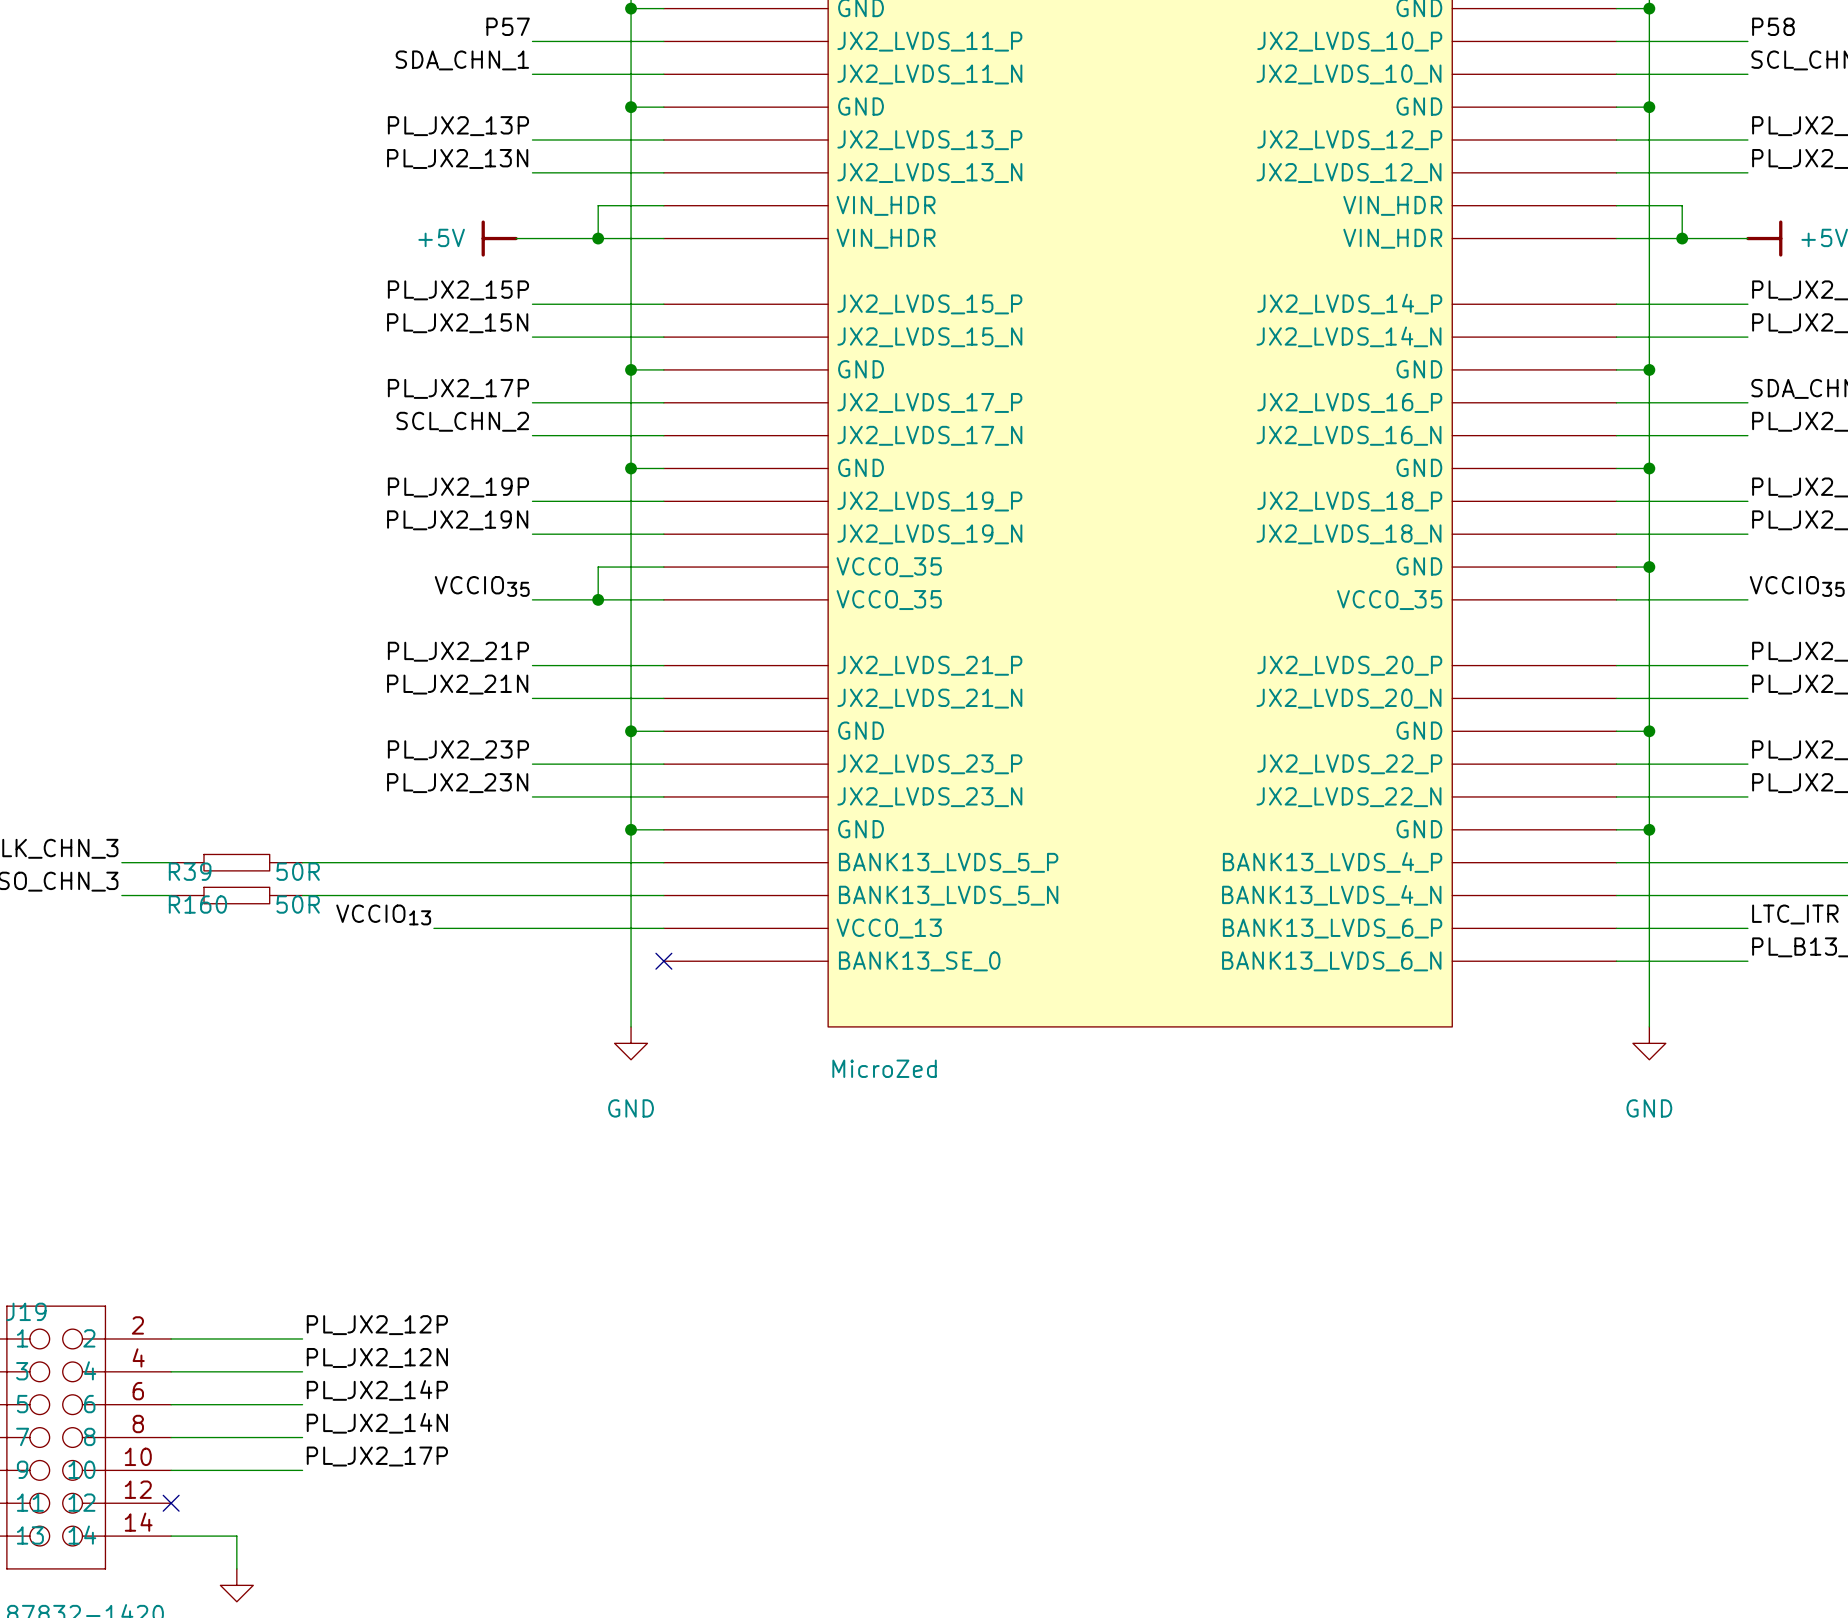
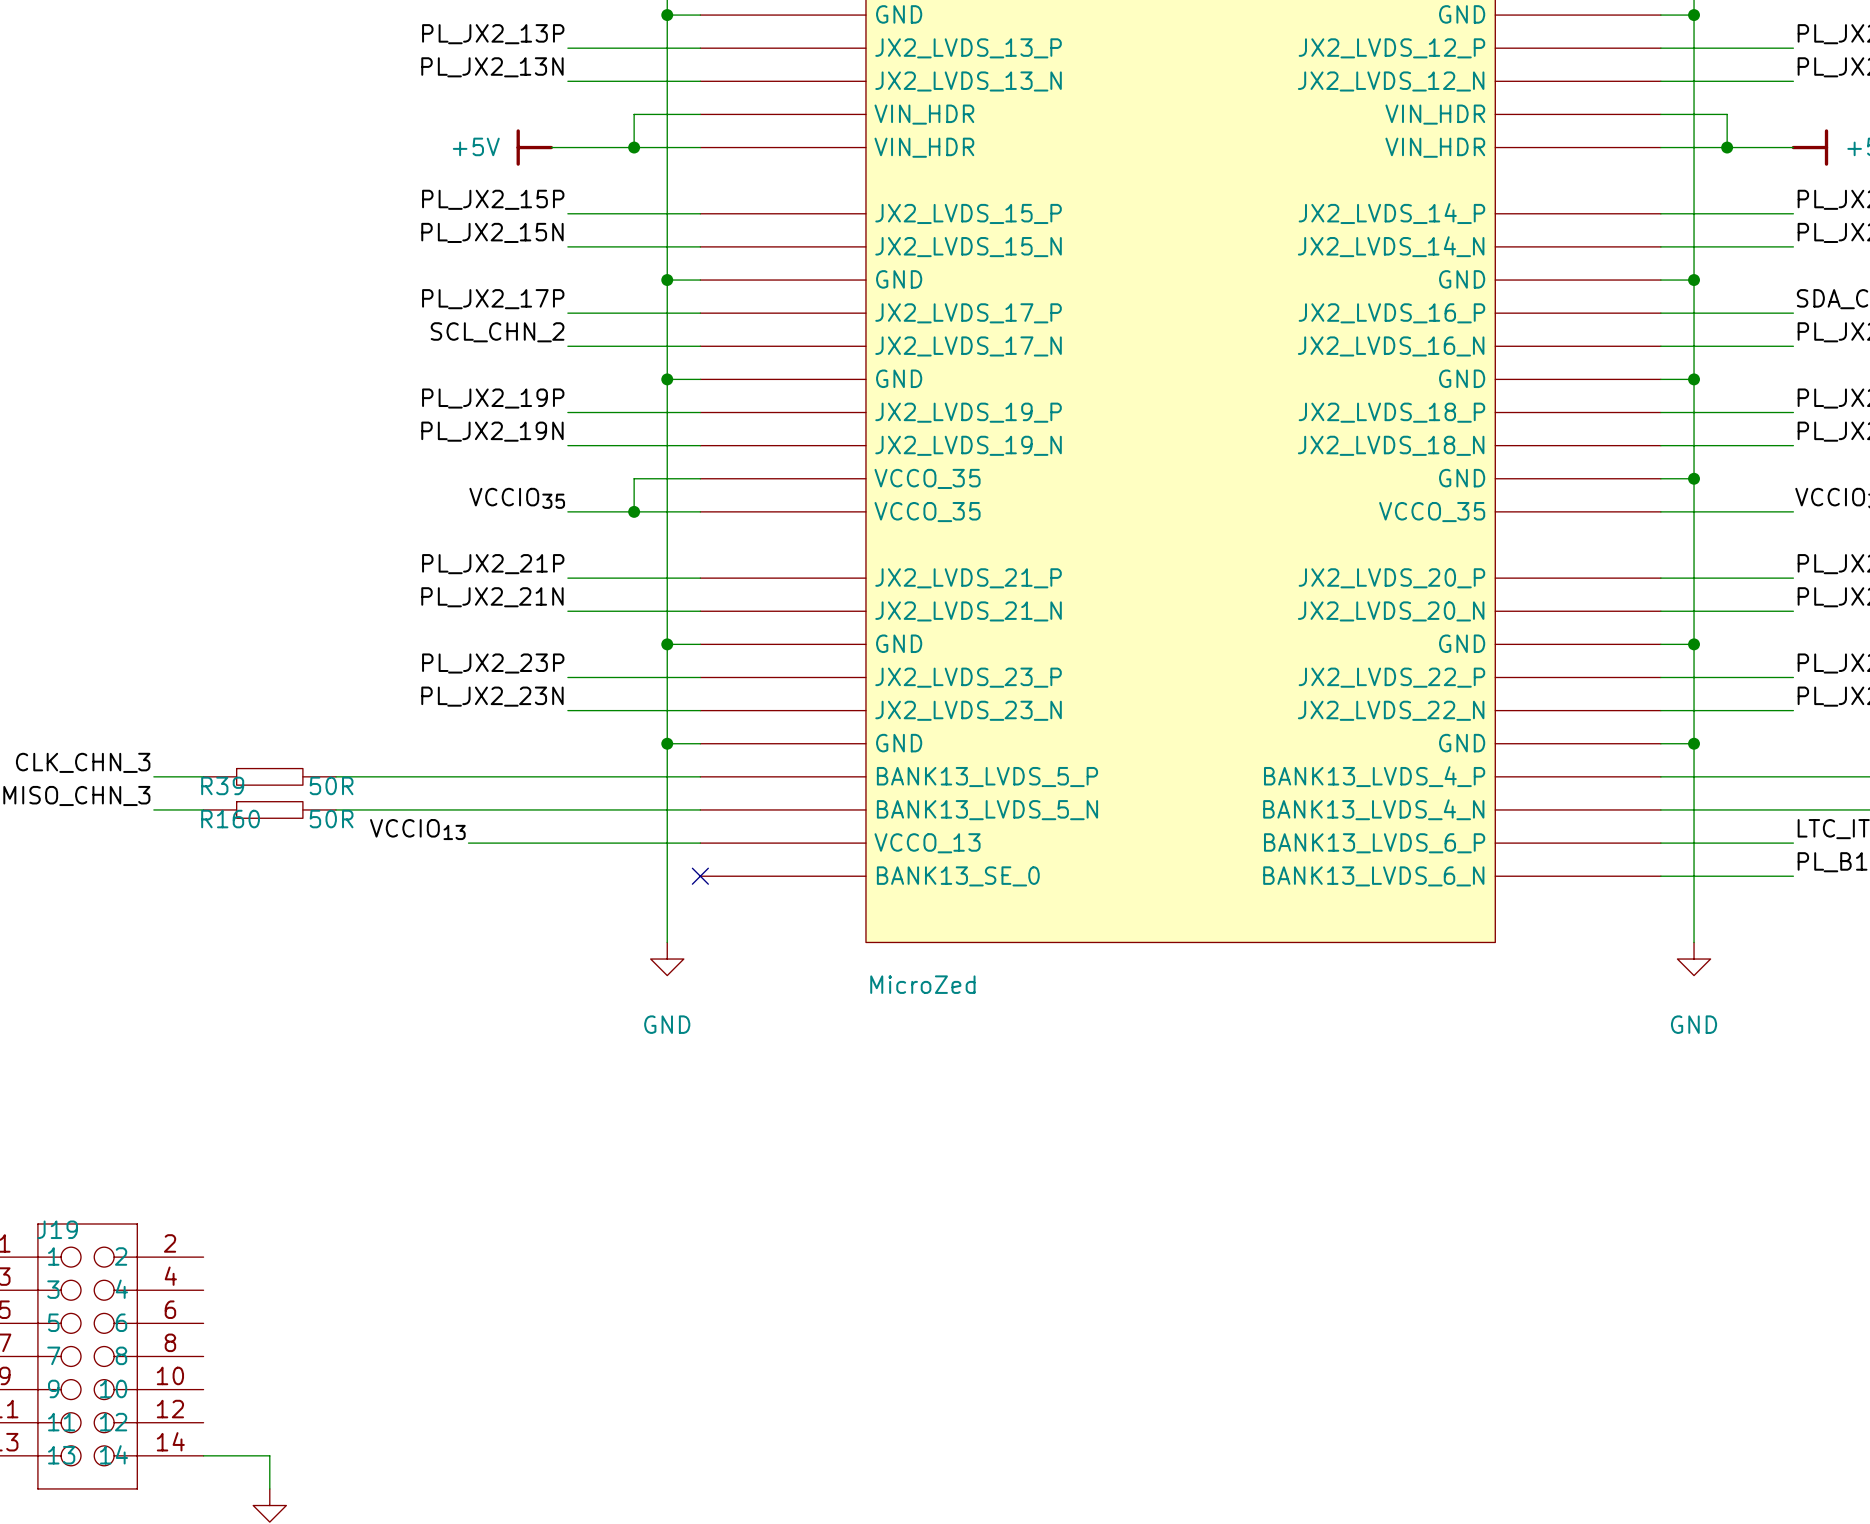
label: PL_JX2_12P (377, 1325) -> none
wire: (171, 1338) (302, 1338) -> none
label: PL_JX2_12N (377, 1357) -> none
wire: (171, 1371) (302, 1371) -> none
label: PL_JX2_14P (377, 1390) -> none
wire: (171, 1404) (302, 1404) -> none
label: PL_JX2_14N (377, 1423) -> none
wire: (171, 1437) (302, 1437) -> none
label: PL_JX2_17P (377, 1456) -> none
wire: (171, 1470) (302, 1470) -> none
no-connect mark: (171, 1503) -> none

